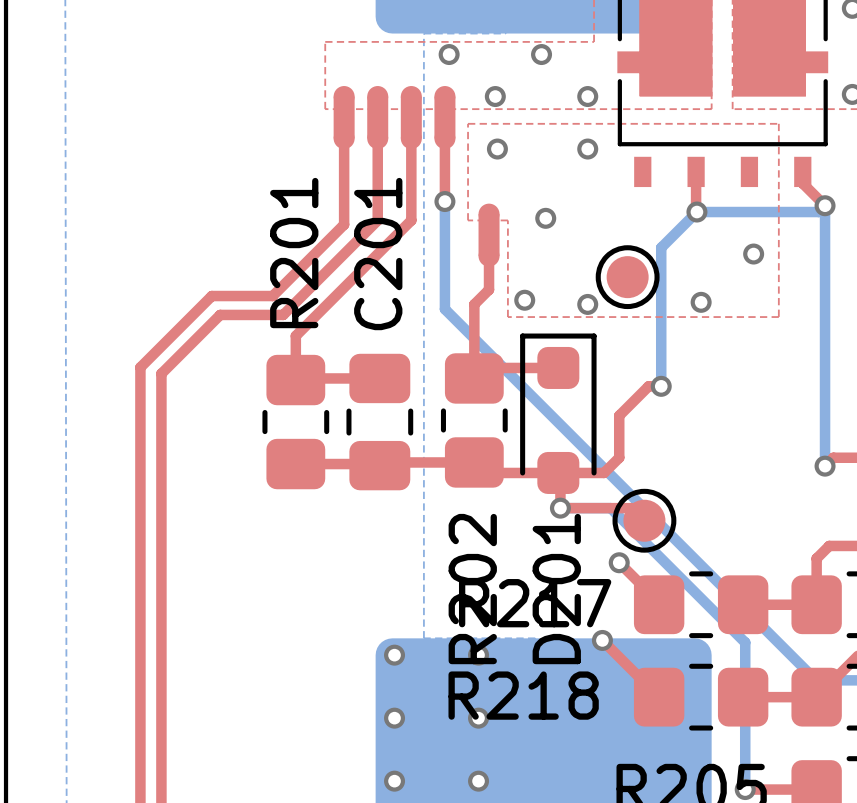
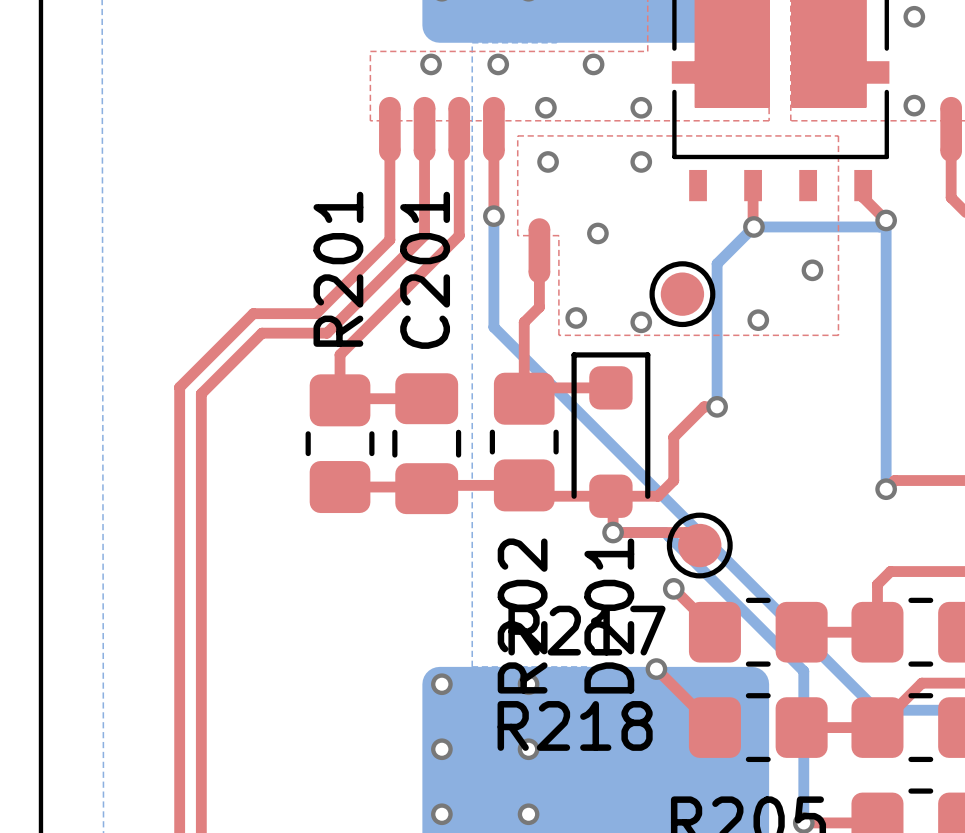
via: none -> (431, 64)

